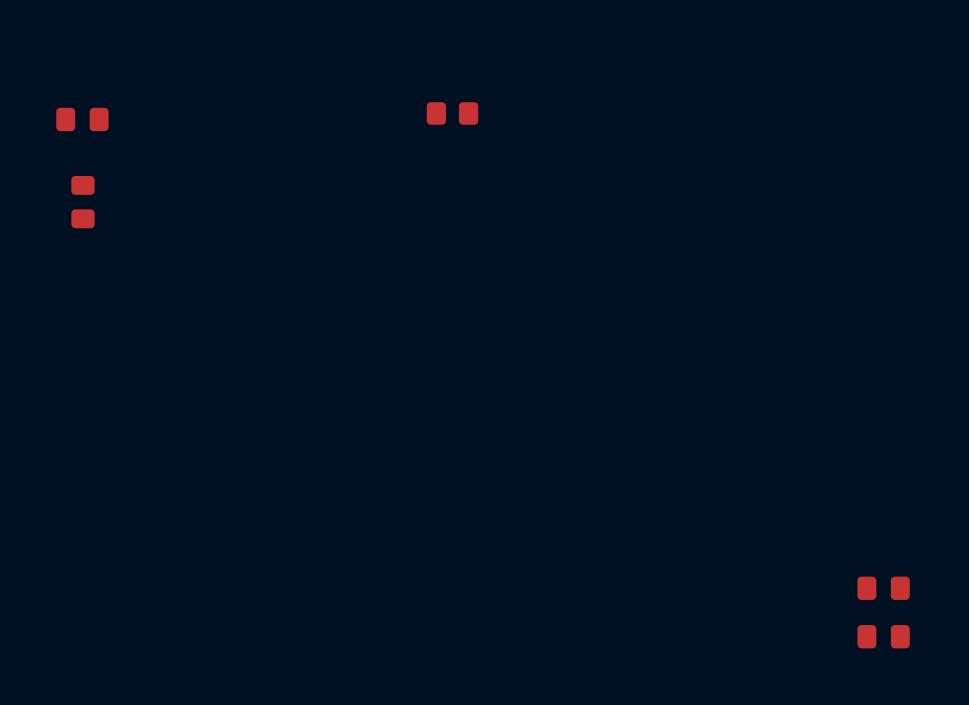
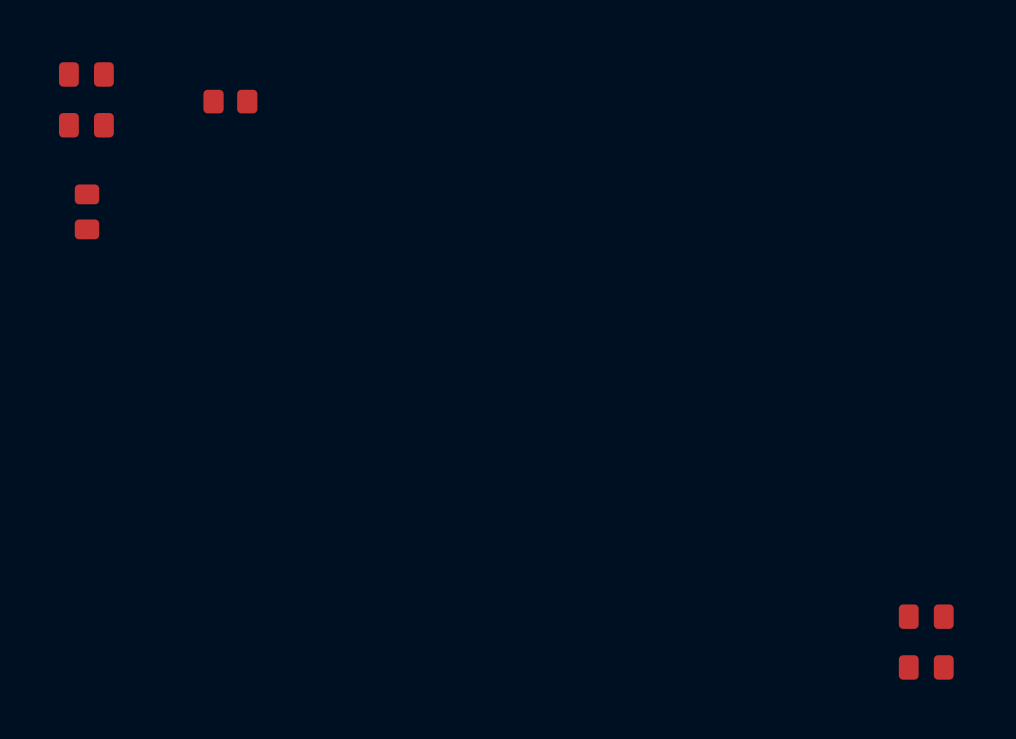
part: none -> (86, 74)
part position: (452, 113) -> (230, 101)

